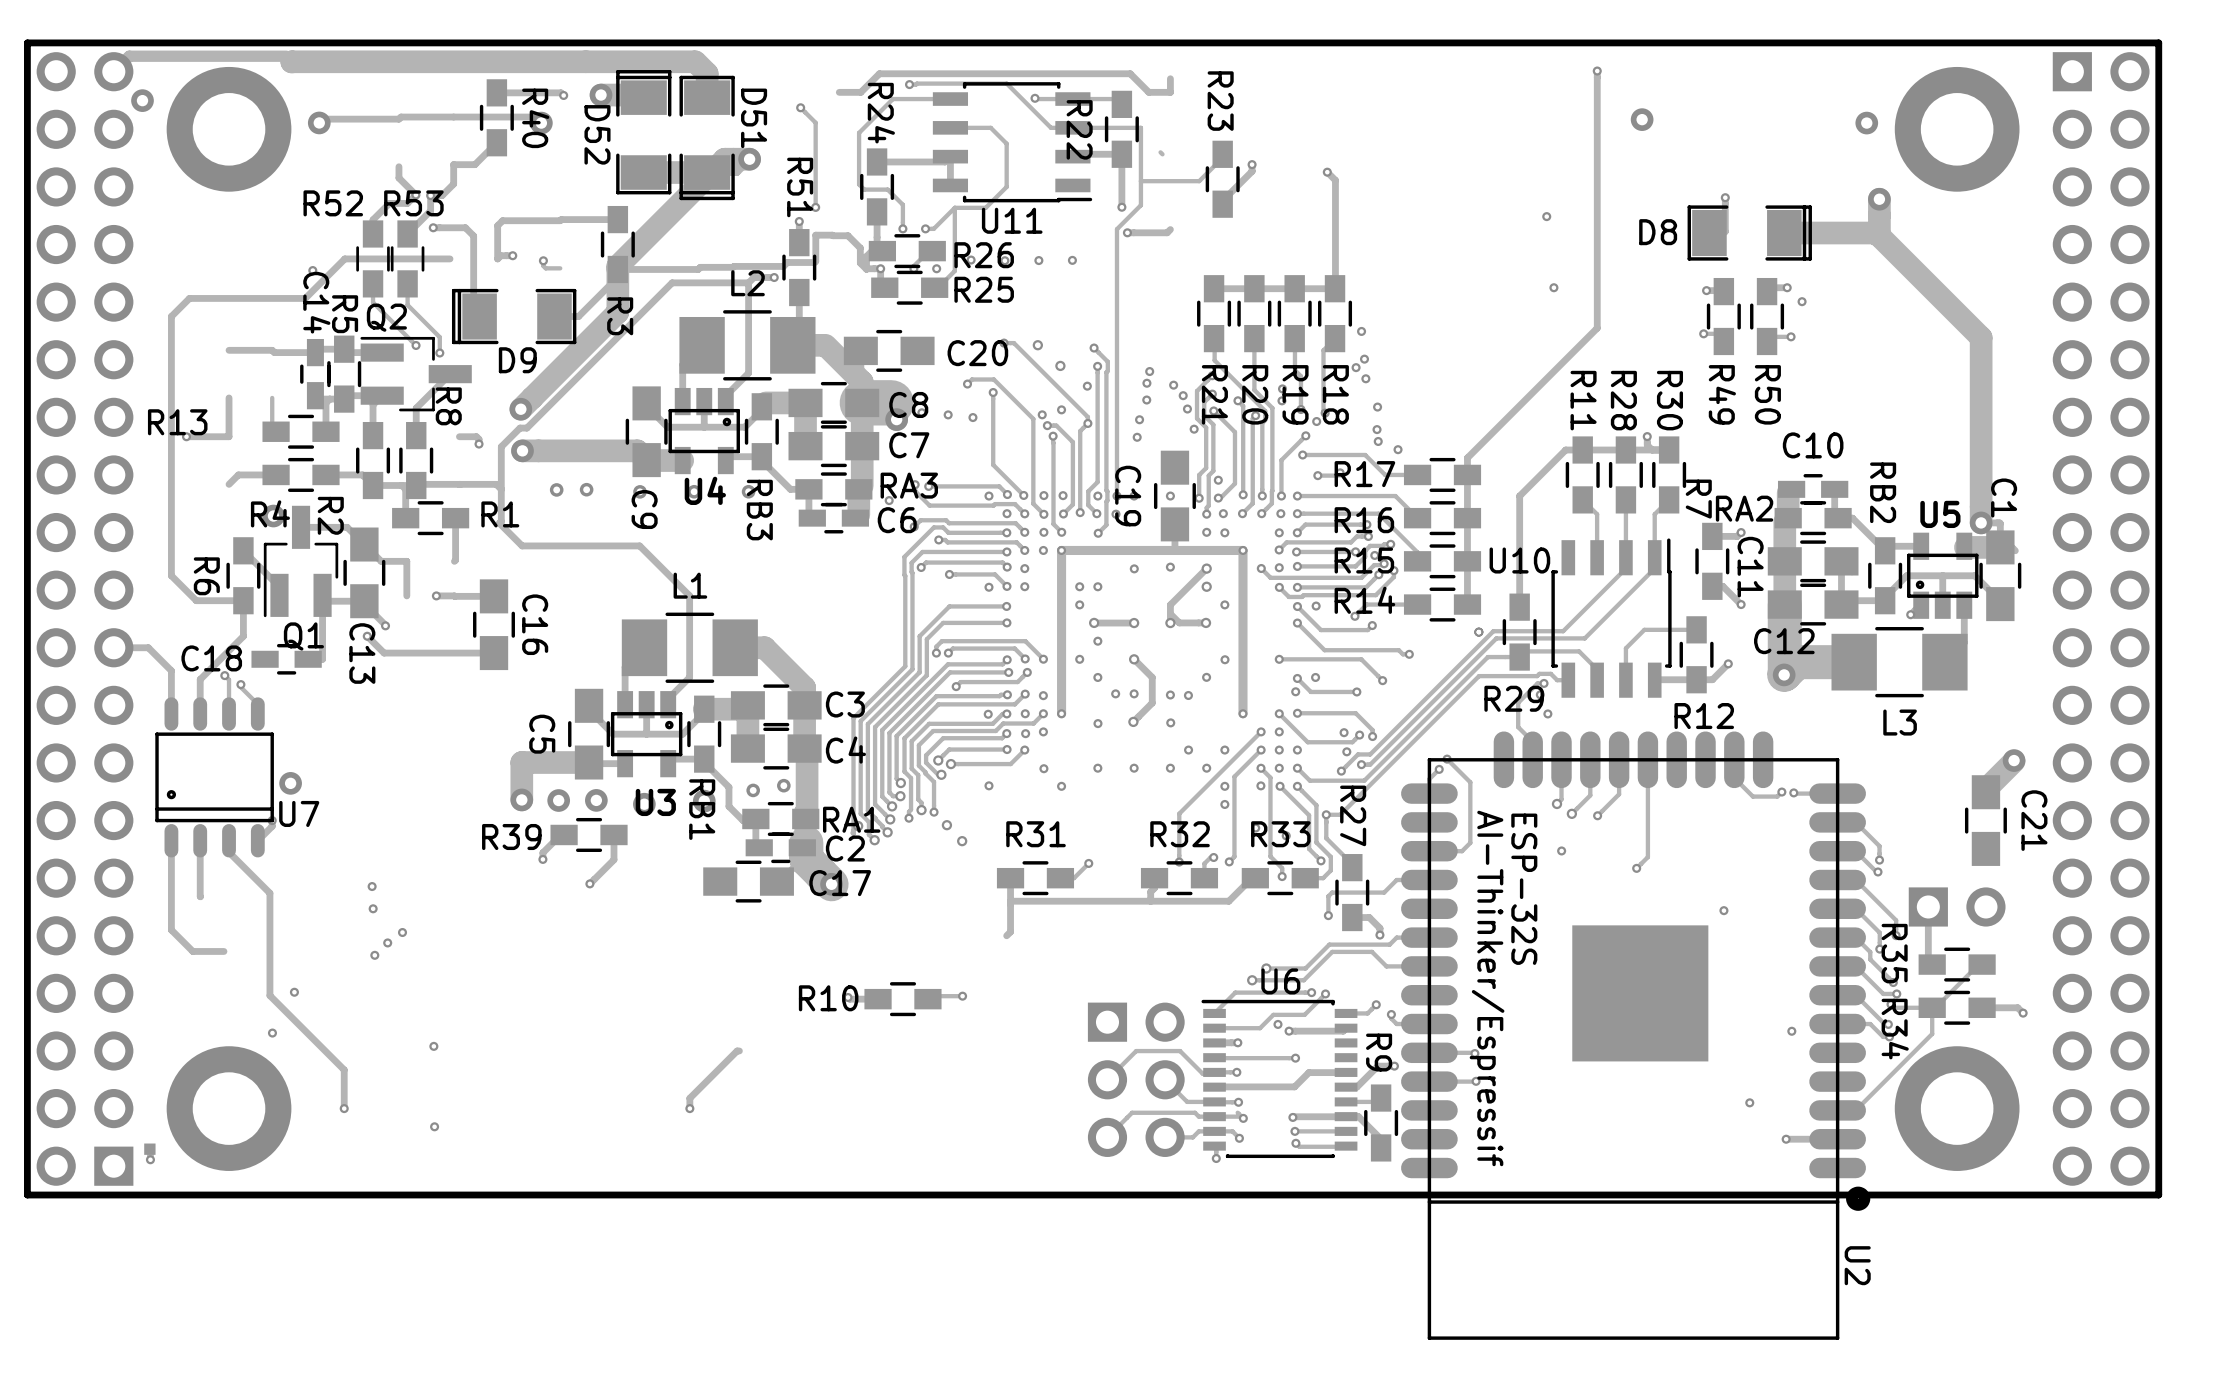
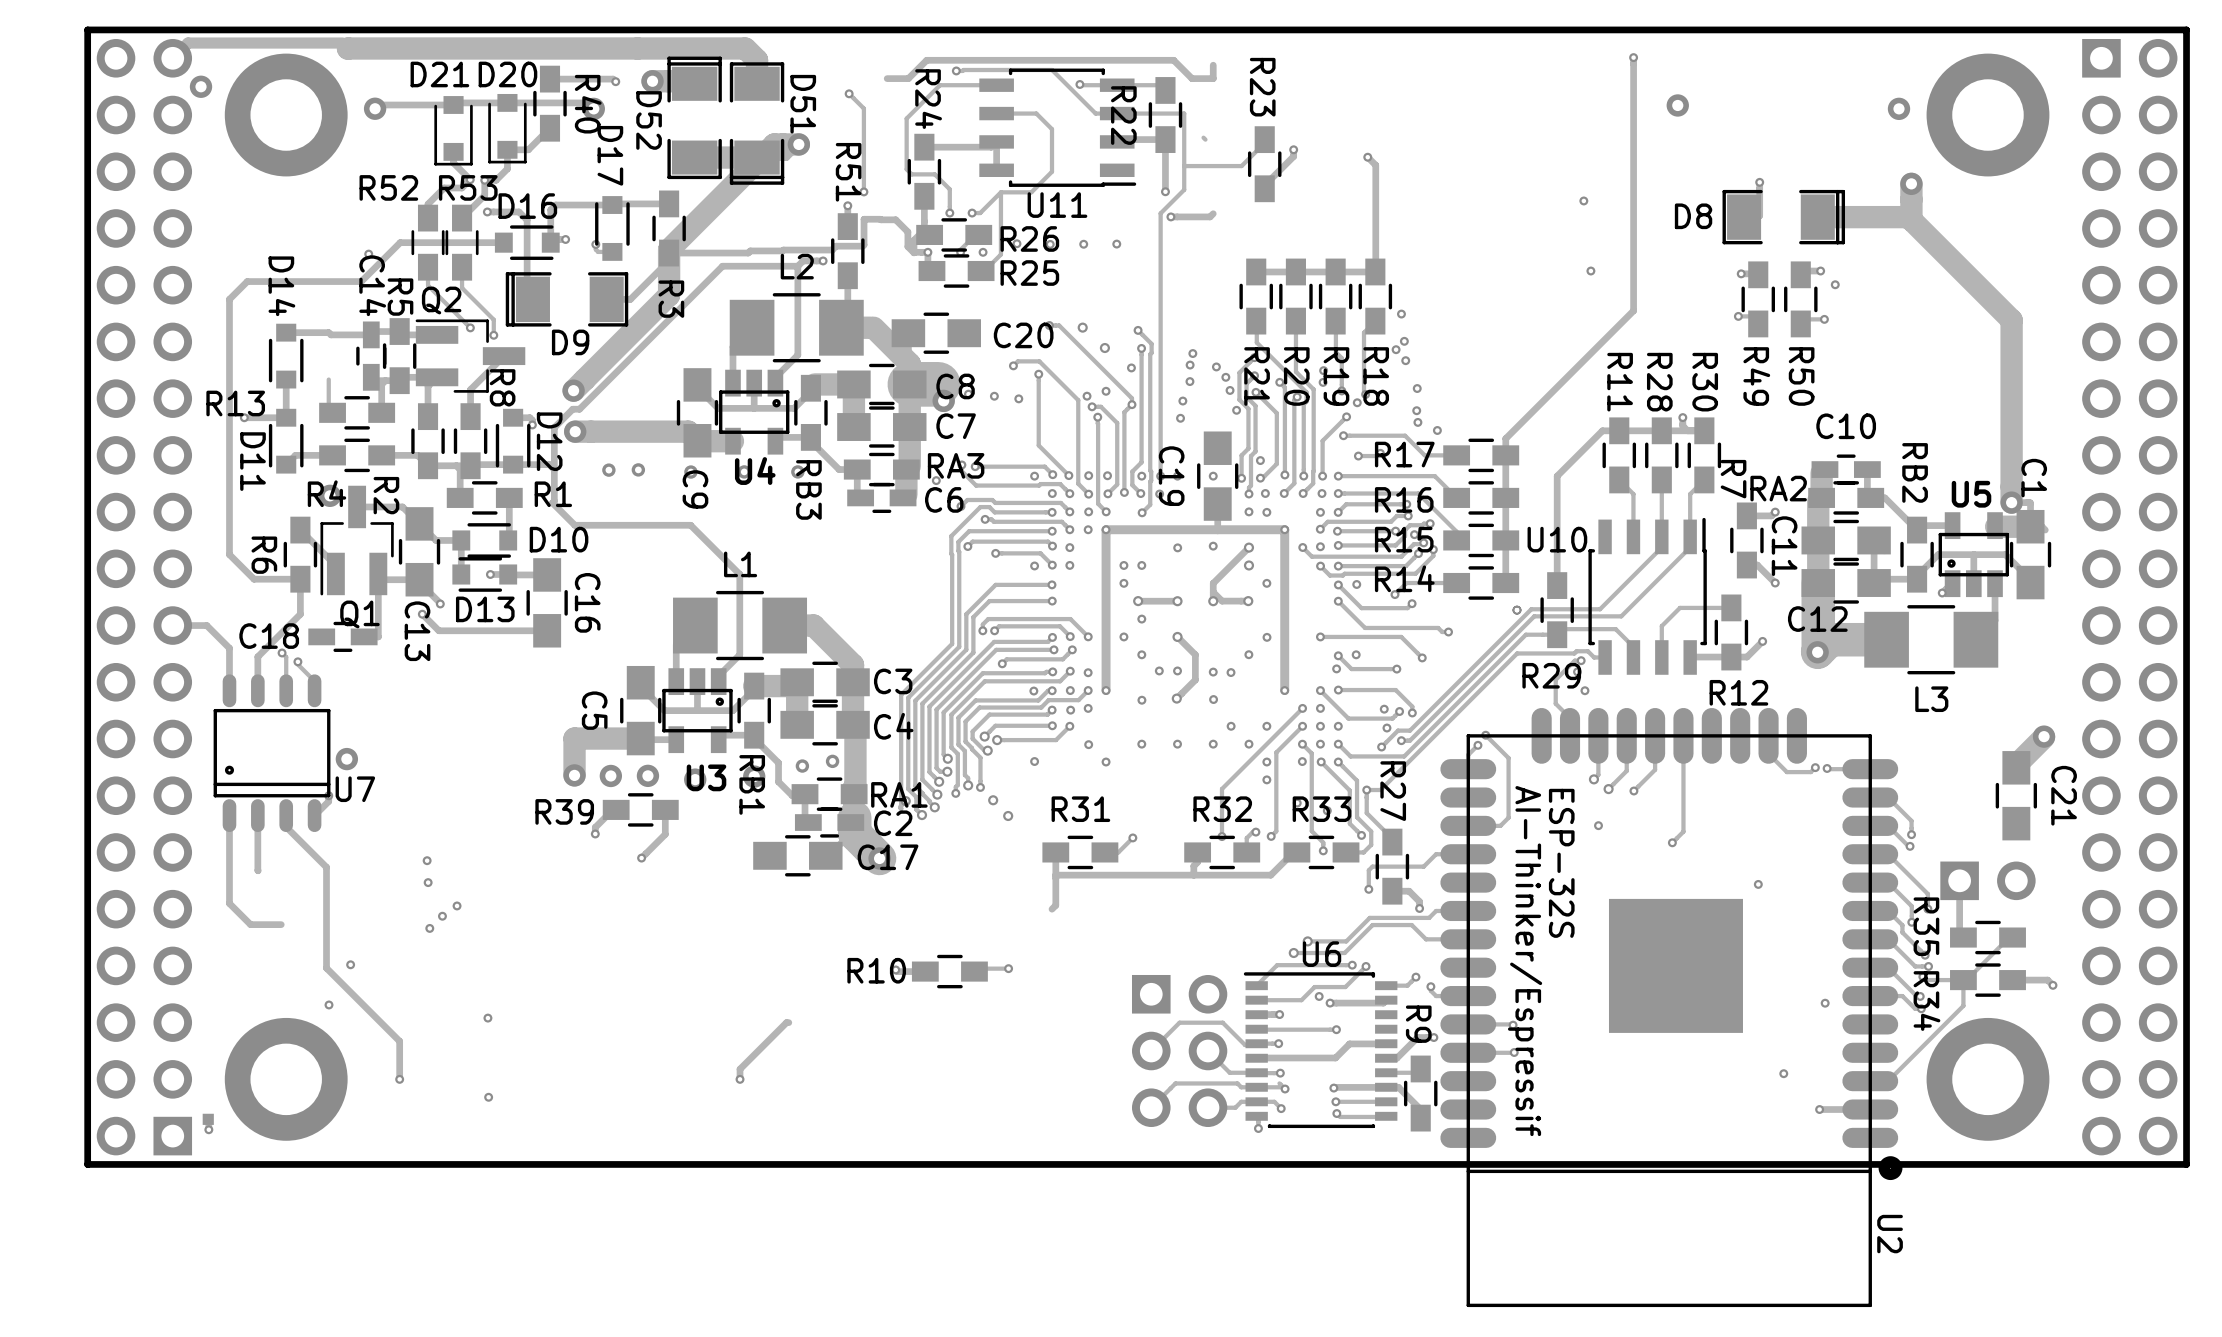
D20: none -> (507, 128)
D21: none -> (453, 130)
D17: none -> (612, 228)
D16: none -> (527, 242)
D14: none -> (286, 356)
D11: none -> (286, 441)
D12: none -> (513, 441)
D10: none -> (484, 540)
D13: none -> (484, 574)

